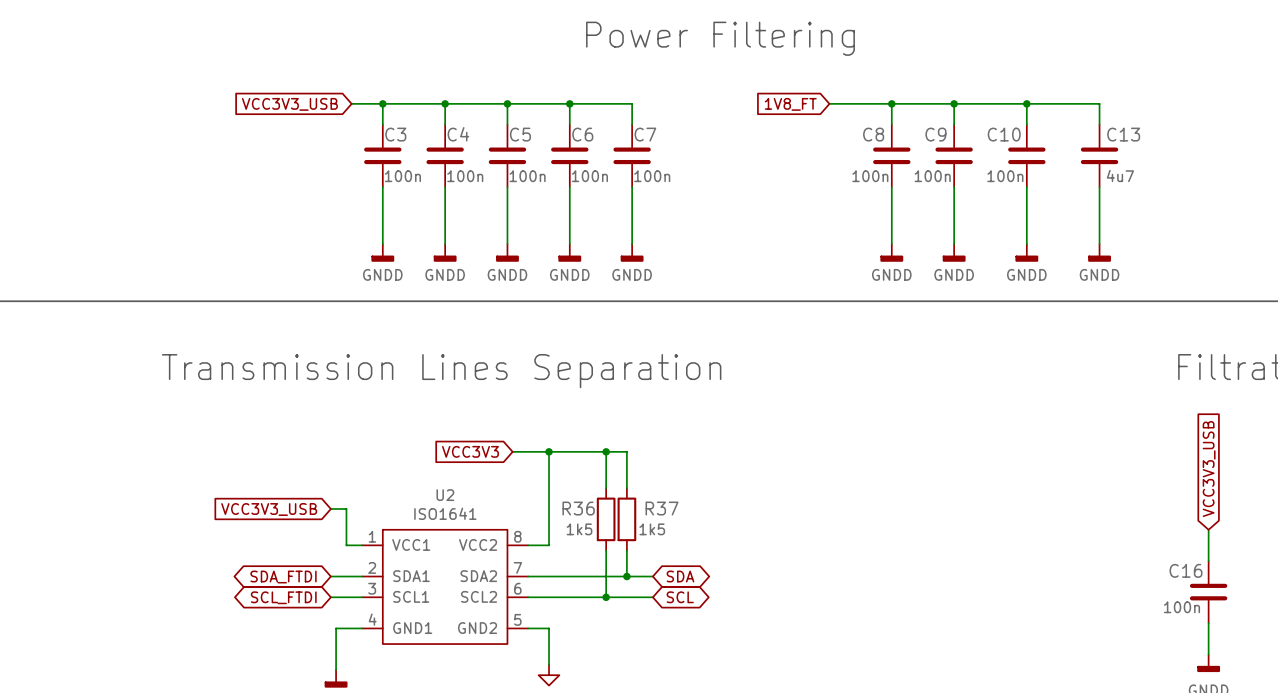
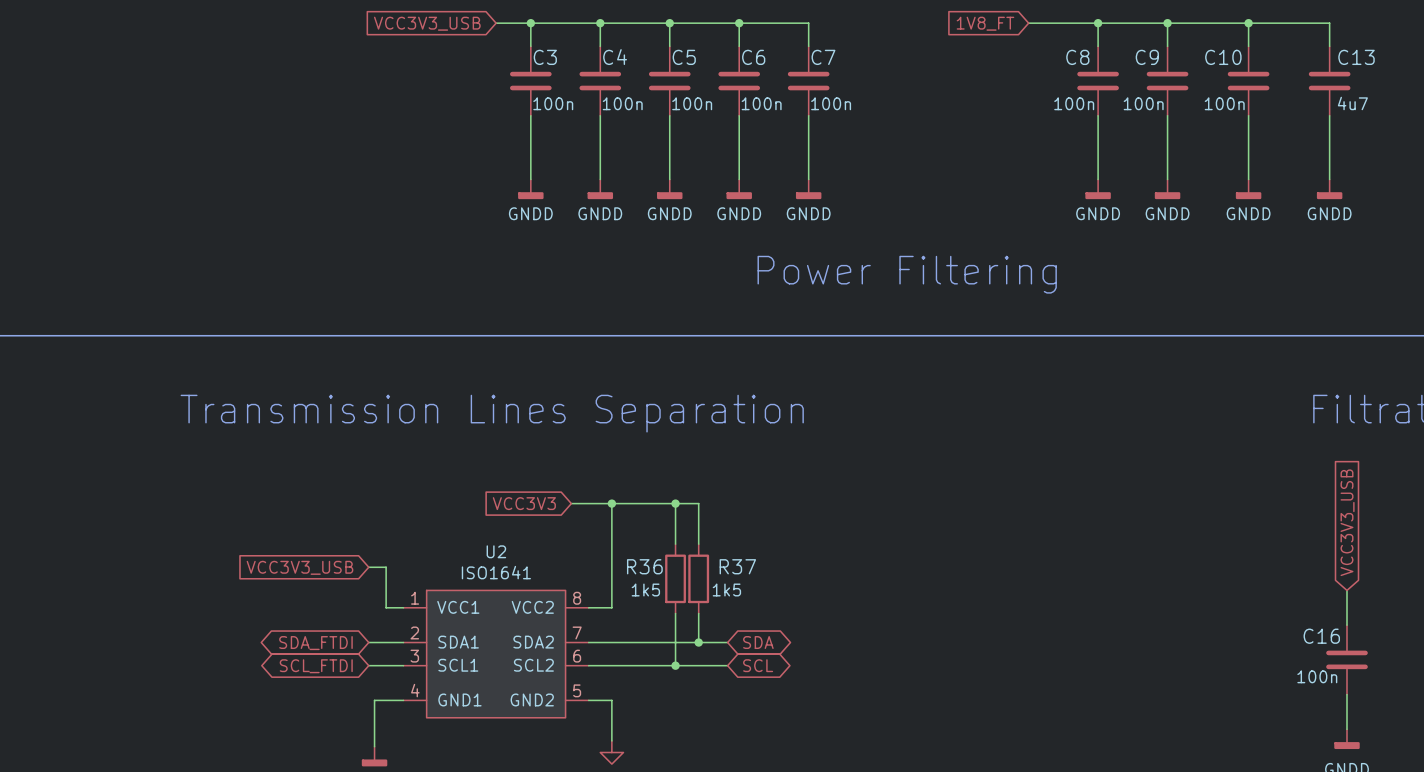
junction: none -> (530, 23)
junction: none -> (600, 23)
junction: none -> (669, 23)
junction: none -> (739, 23)
junction: none -> (1098, 23)
junction: none -> (1167, 23)
junction: none -> (1248, 23)
text: Power Filtering (720, 38) -> none
wire: (351, 103) (632, 103) (632, 124) -> (496, 23) (808, 23) (808, 46)
wire: (382, 103) (382, 124) -> (530, 23) (530, 46)
junction: (382, 103) -> none
wire: (445, 103) (445, 124) -> (600, 23) (600, 46)
junction: (445, 103) -> none
wire: (507, 103) (507, 124) -> (669, 23) (669, 46)
junction: (507, 103) -> none
wire: (569, 103) (569, 124) -> (739, 23) (739, 46)
junction: (569, 103) -> none
wire: (829, 103) (1099, 103) (1099, 124) -> (1028, 23) (1329, 23) (1329, 46)
wire: (891, 103) (891, 124) -> (1098, 23) (1098, 46)
junction: (891, 103) -> none
wire: (954, 103) (954, 124) -> (1167, 23) (1167, 46)
junction: (954, 103) -> none
wire: (1026, 103) (1026, 124) -> (1248, 23) (1248, 46)
junction: (1026, 103) -> none
global label position: VCC3V3_USB (289, 104) -> VCC3V3_USB (427, 23)
global label position: 1V8_FT (790, 104) -> 1V8_FT (985, 23)
C3 position: (382, 155) -> (530, 81)
C4 position: (445, 155) -> (600, 81)
C5 position: (507, 155) -> (669, 81)
C6 position: (569, 155) -> (739, 81)
C7 position: (632, 155) -> (808, 81)
C8 position: (891, 155) -> (1098, 81)
C9 position: (954, 155) -> (1167, 81)
C10 position: (1026, 155) -> (1248, 81)
C13 position: (1099, 155) -> (1329, 81)
power symbol: none -> GNDD (530, 189)
power symbol: none -> GNDD (600, 189)
power symbol: none -> GNDD (669, 189)
power symbol: none -> GNDD (739, 189)
power symbol: none -> GNDD (808, 189)
power symbol: none -> GNDD (1098, 189)
power symbol: none -> GNDD (1167, 189)
power symbol: none -> GNDD (1248, 189)
power symbol: none -> GNDD (1329, 189)
wire: (382, 186) (382, 244) -> (530, 115) (530, 179)
wire: (445, 186) (445, 244) -> (600, 115) (600, 179)
wire: (507, 186) (507, 244) -> (669, 115) (669, 179)
wire: (569, 186) (569, 244) -> (739, 115) (739, 179)
wire: (632, 186) (632, 244) -> (808, 115) (808, 179)
wire: (891, 186) (891, 244) -> (1098, 115) (1098, 179)
wire: (954, 186) (954, 244) -> (1167, 115) (1167, 179)
wire: (1026, 186) (1026, 244) -> (1248, 115) (1248, 179)
wire: (1099, 186) (1099, 244) -> (1329, 115) (1329, 179)
text: none -> Power Filtering (907, 274)
power symbol: GNDD (382, 252) -> none
power symbol: GNDD (445, 252) -> none
power symbol: GNDD (507, 252) -> none
power symbol: GNDD (569, 252) -> none
power symbol: GNDD (632, 252) -> none
power symbol: GNDD (891, 252) -> none
power symbol: GNDD (954, 252) -> none
power symbol: GNDD (1026, 252) -> none
power symbol: GNDD (1099, 252) -> none

